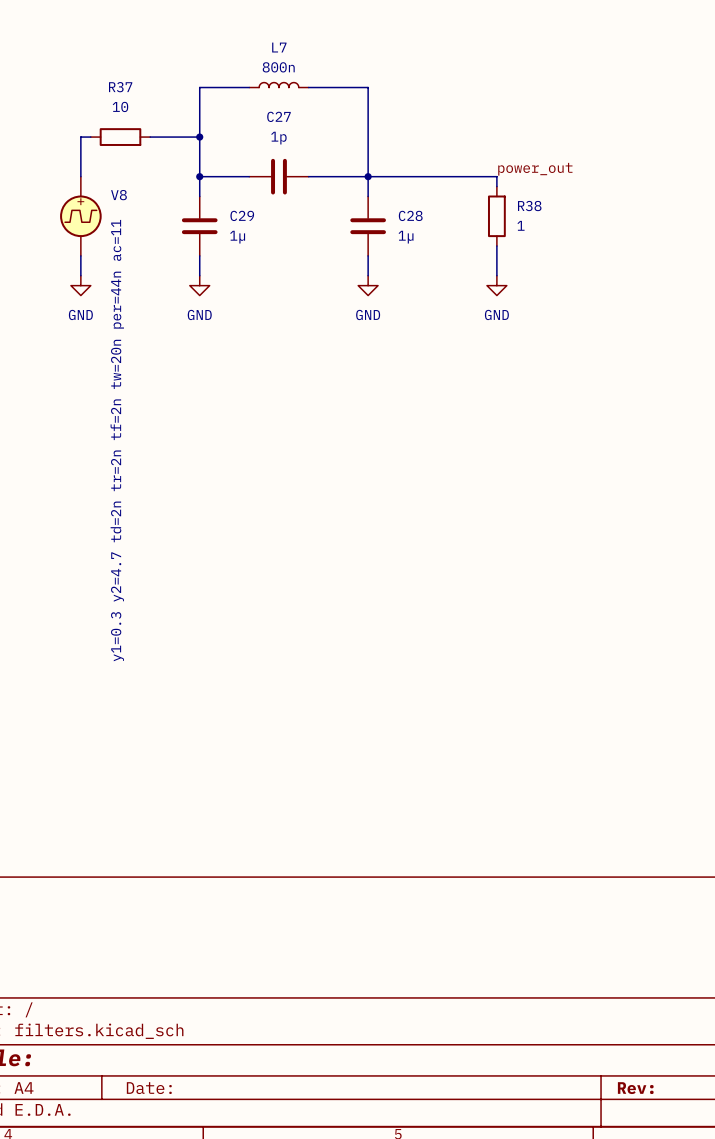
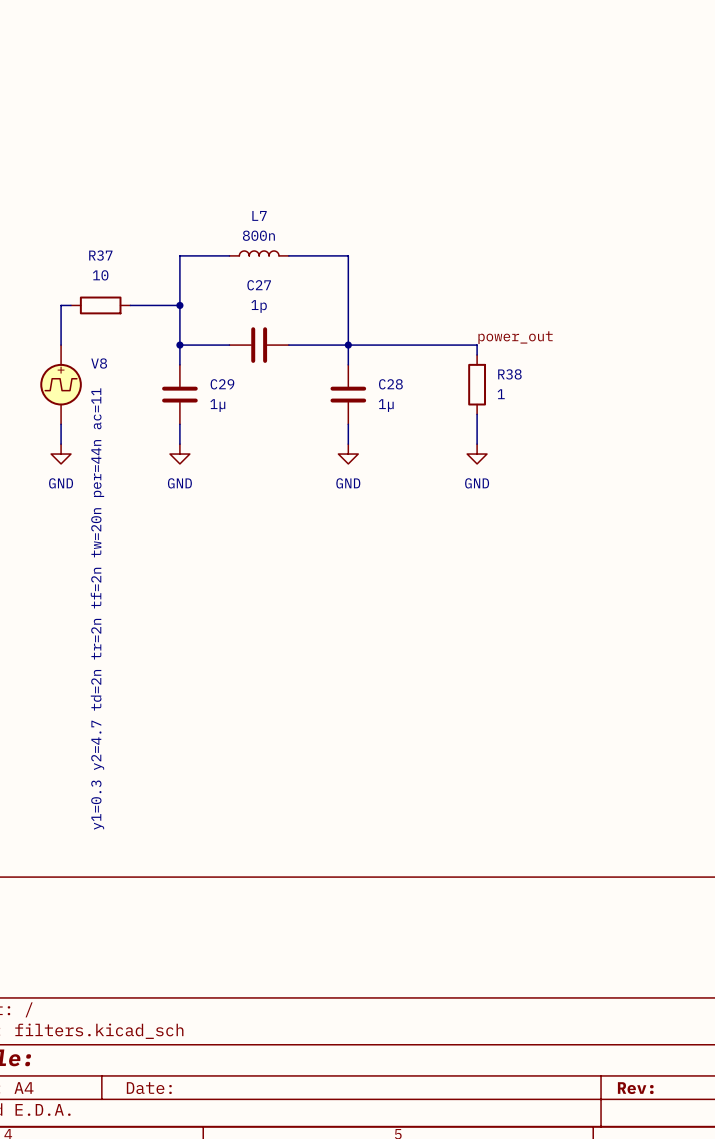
L7 position: (278, 85) -> (259, 253)
wire: (249, 87) (199, 87) (199, 196) -> (229, 255) (179, 255) (179, 364)
wire: (308, 87) (368, 87) (368, 196) -> (288, 255) (348, 255) (348, 364)
wire: (90, 137) (80, 137) (80, 176) -> (70, 305) (61, 305) (61, 345)
R37 position: (120, 137) -> (100, 305)
wire: (150, 137) (199, 137) -> (130, 305) (179, 305)
junction: (199, 137) -> none
label position: power_out (535, 169) -> power_out (515, 337)
wire: (199, 176) (249, 176) -> (179, 345) (229, 345)
junction: (199, 176) -> none
C27 position: (278, 176) -> (259, 345)
wire: (308, 176) (496, 176) (496, 186) -> (288, 345) (477, 345) (477, 354)
junction: (368, 176) -> none
V8 position: (80, 216) -> (61, 384)
R38 position: (496, 216) -> (477, 384)
C29 position: (199, 226) -> (179, 394)
C28 position: (368, 226) -> (348, 394)
wire: (496, 246) (496, 275) -> (477, 414) (477, 444)
wire: (80, 255) (80, 275) -> (61, 424) (61, 444)
wire: (199, 255) (199, 275) -> (179, 424) (179, 444)
wire: (368, 255) (368, 275) -> (348, 424) (348, 444)
power symbol: GND (80, 285) -> none
power symbol: GND (199, 285) -> none
power symbol: GND (368, 285) -> none
power symbol: GND (496, 285) -> none
junction: none -> (179, 305)
junction: none -> (179, 345)
junction: none -> (348, 345)
power symbol: none -> GND (61, 454)
power symbol: none -> GND (179, 454)
power symbol: none -> GND (348, 454)
power symbol: none -> GND (477, 454)

